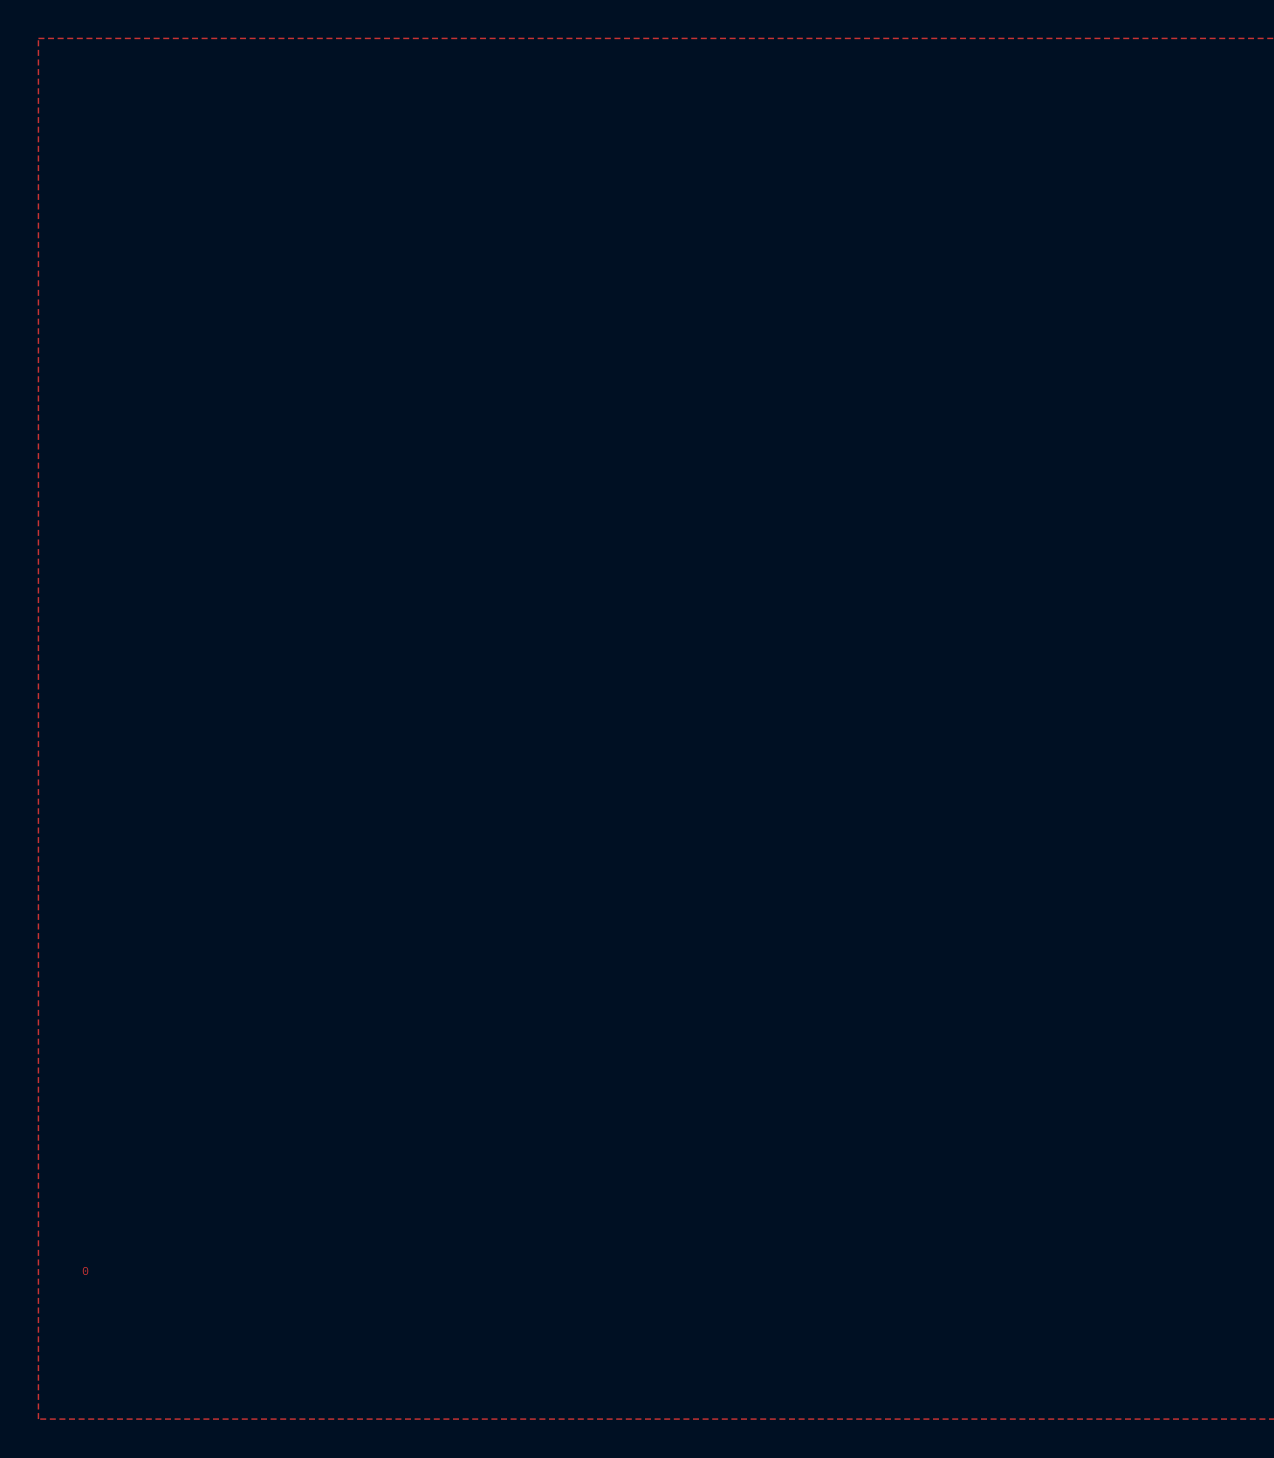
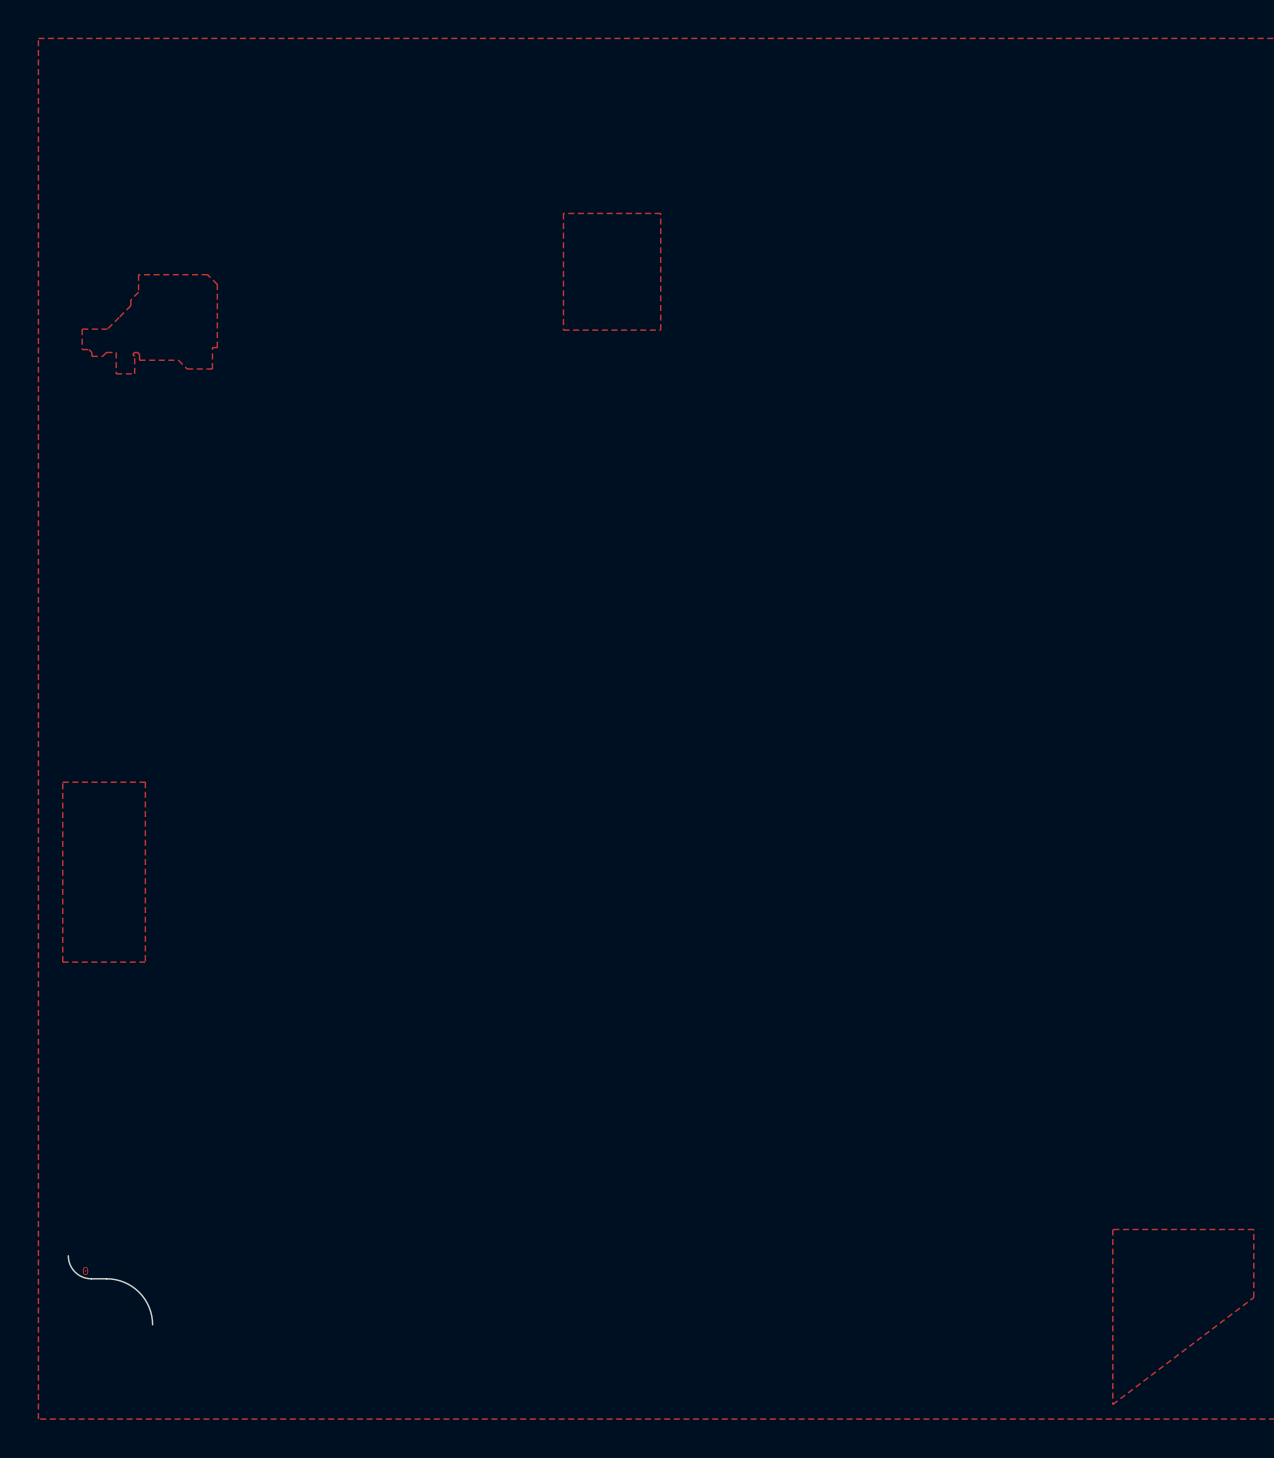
zone outline: none -> (563, 213) (660, 213) (660, 330) (563, 330) (563, 213)
zone outline: none -> (138, 274) (207, 274) (217, 284) (217, 347) (212, 347) (212, 369) (187, 369) (178, 360) (139, 360) (139, 354) (134, 352) (132, 354) (134, 356) (134, 373) (116, 373) (116, 352) (106, 352) (102, 356) (91, 356) (91, 352) (88, 349) (82, 349) (82, 329) (107, 329) (130, 305) (130, 299) (138, 292) (138, 274)
zone outline: none -> (62, 782) (145, 782) (145, 962) (62, 962) (62, 782)
zone outline: none -> (1112, 1229) (1253, 1229) (1253, 1297) (1112, 1404) (1112, 1229)
board edge: none -> (68, 1255) (71, 1267) (79, 1275) (88, 1278) (115, 1279) (135, 1289) (147, 1303) (152, 1324)

